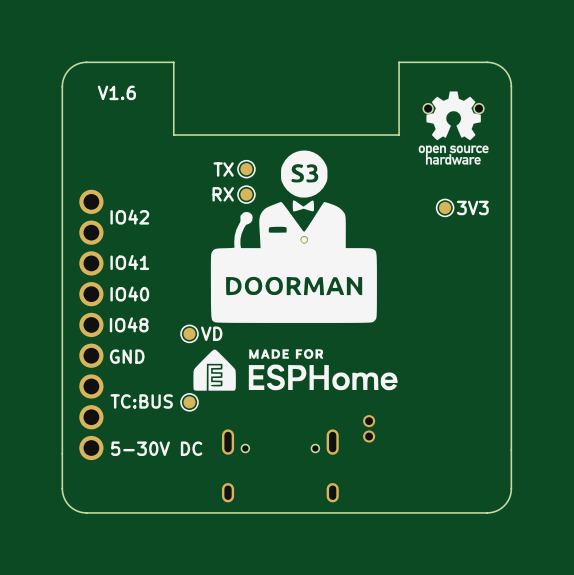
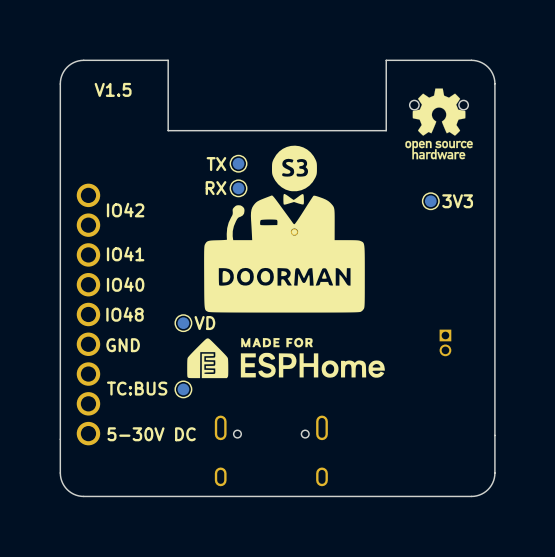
text: V1.6 (116, 92) -> V1.5 (113, 89)
part: none -> (445, 342)
part: (369, 428) -> none

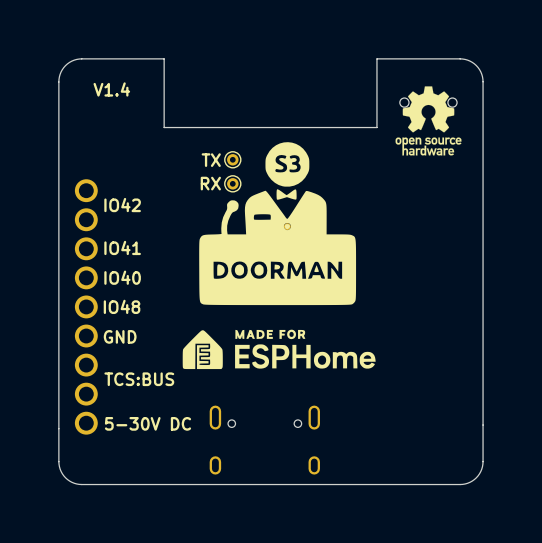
text: V1.5 (113, 89) -> V1.4 (111, 89)
part footprint: [229, 154, 248, 173] -> [224, 151, 242, 169]
part footprint: [229, 179, 248, 198] -> [224, 175, 242, 193]
part: (430, 201) -> none
text: 3V3 (457, 201) -> none
part: (183, 323) -> none
text: VD (204, 323) -> none
part: (445, 342) -> none
text: TC:BUS (137, 388) -> TCS:BUS (139, 379)
part: (183, 389) -> none

